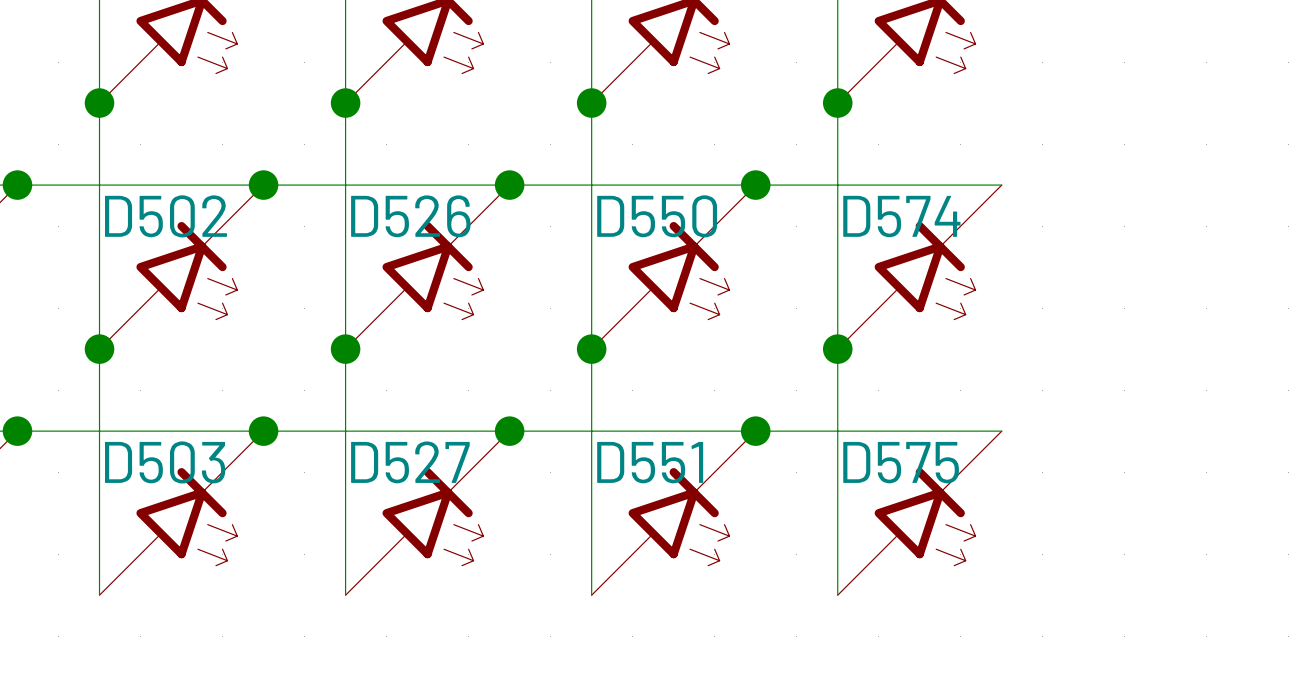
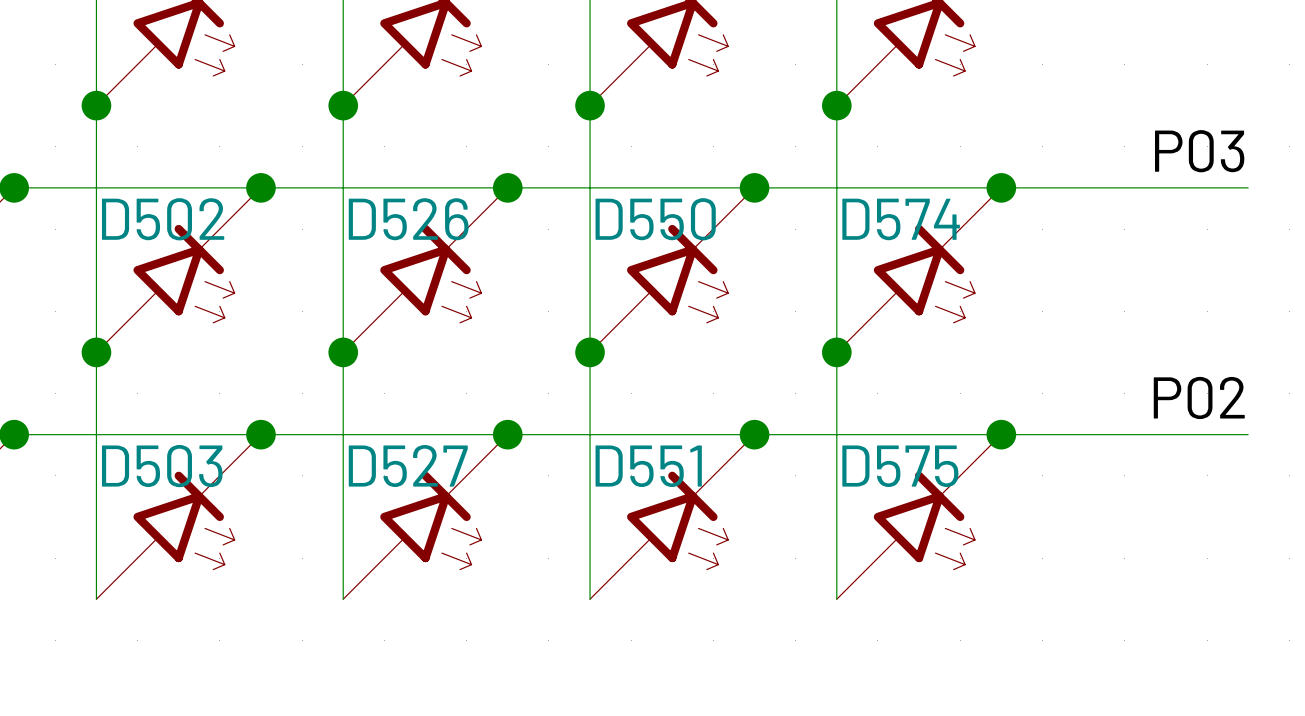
label: none -> P03 (1199, 151)
wire: none -> (1001, 187) (1248, 187)
junction: none -> (1001, 187)
label: none -> P02 (1199, 397)
wire: none -> (1001, 434) (1248, 434)
junction: none -> (1001, 434)

